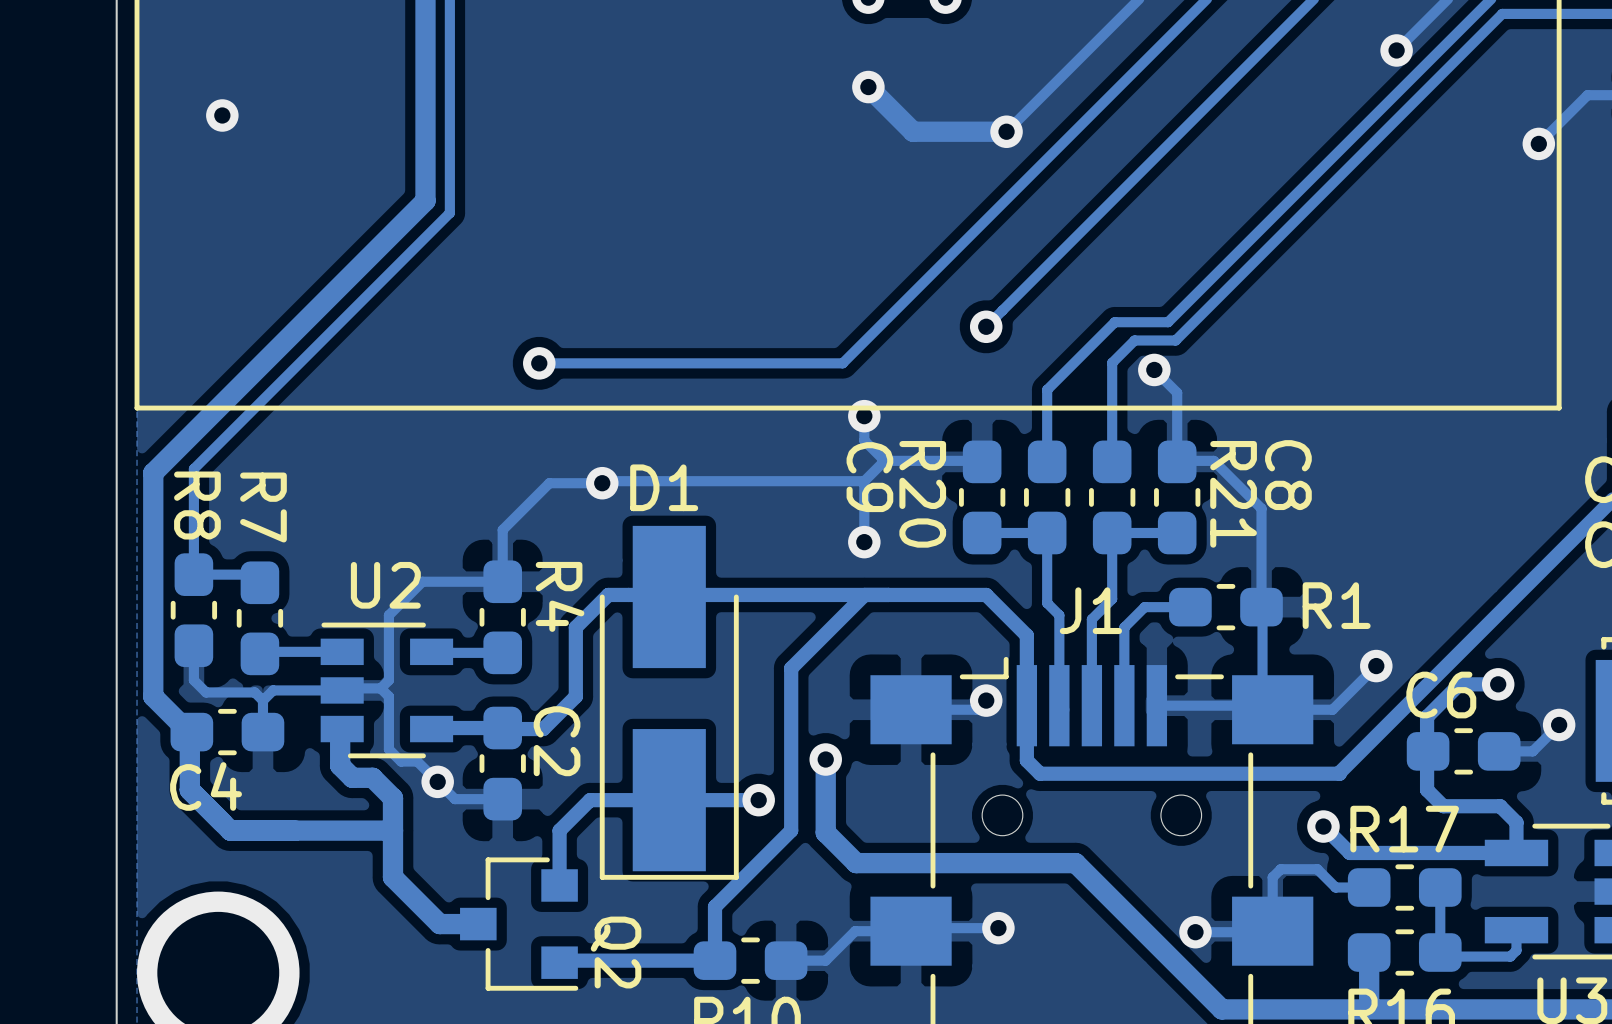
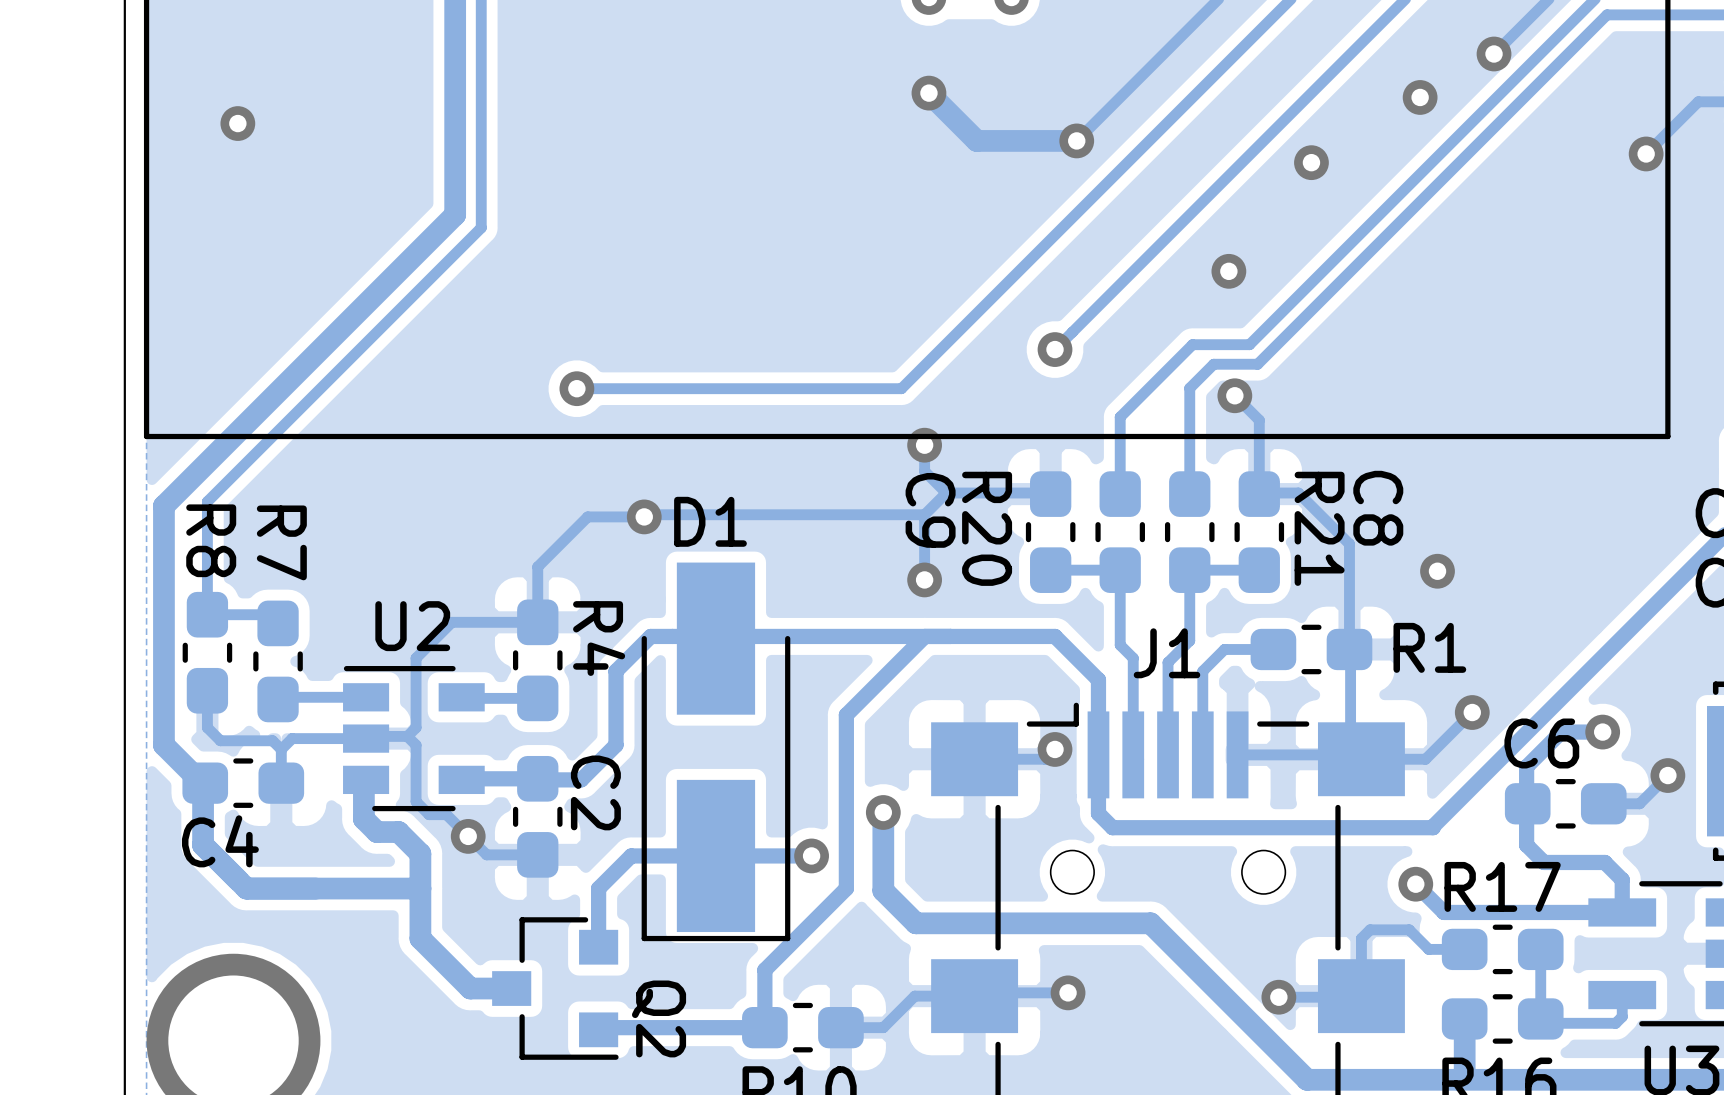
via: none -> (1420, 97)
via: none -> (1311, 162)
via: none -> (1228, 271)
via: none -> (1437, 571)

